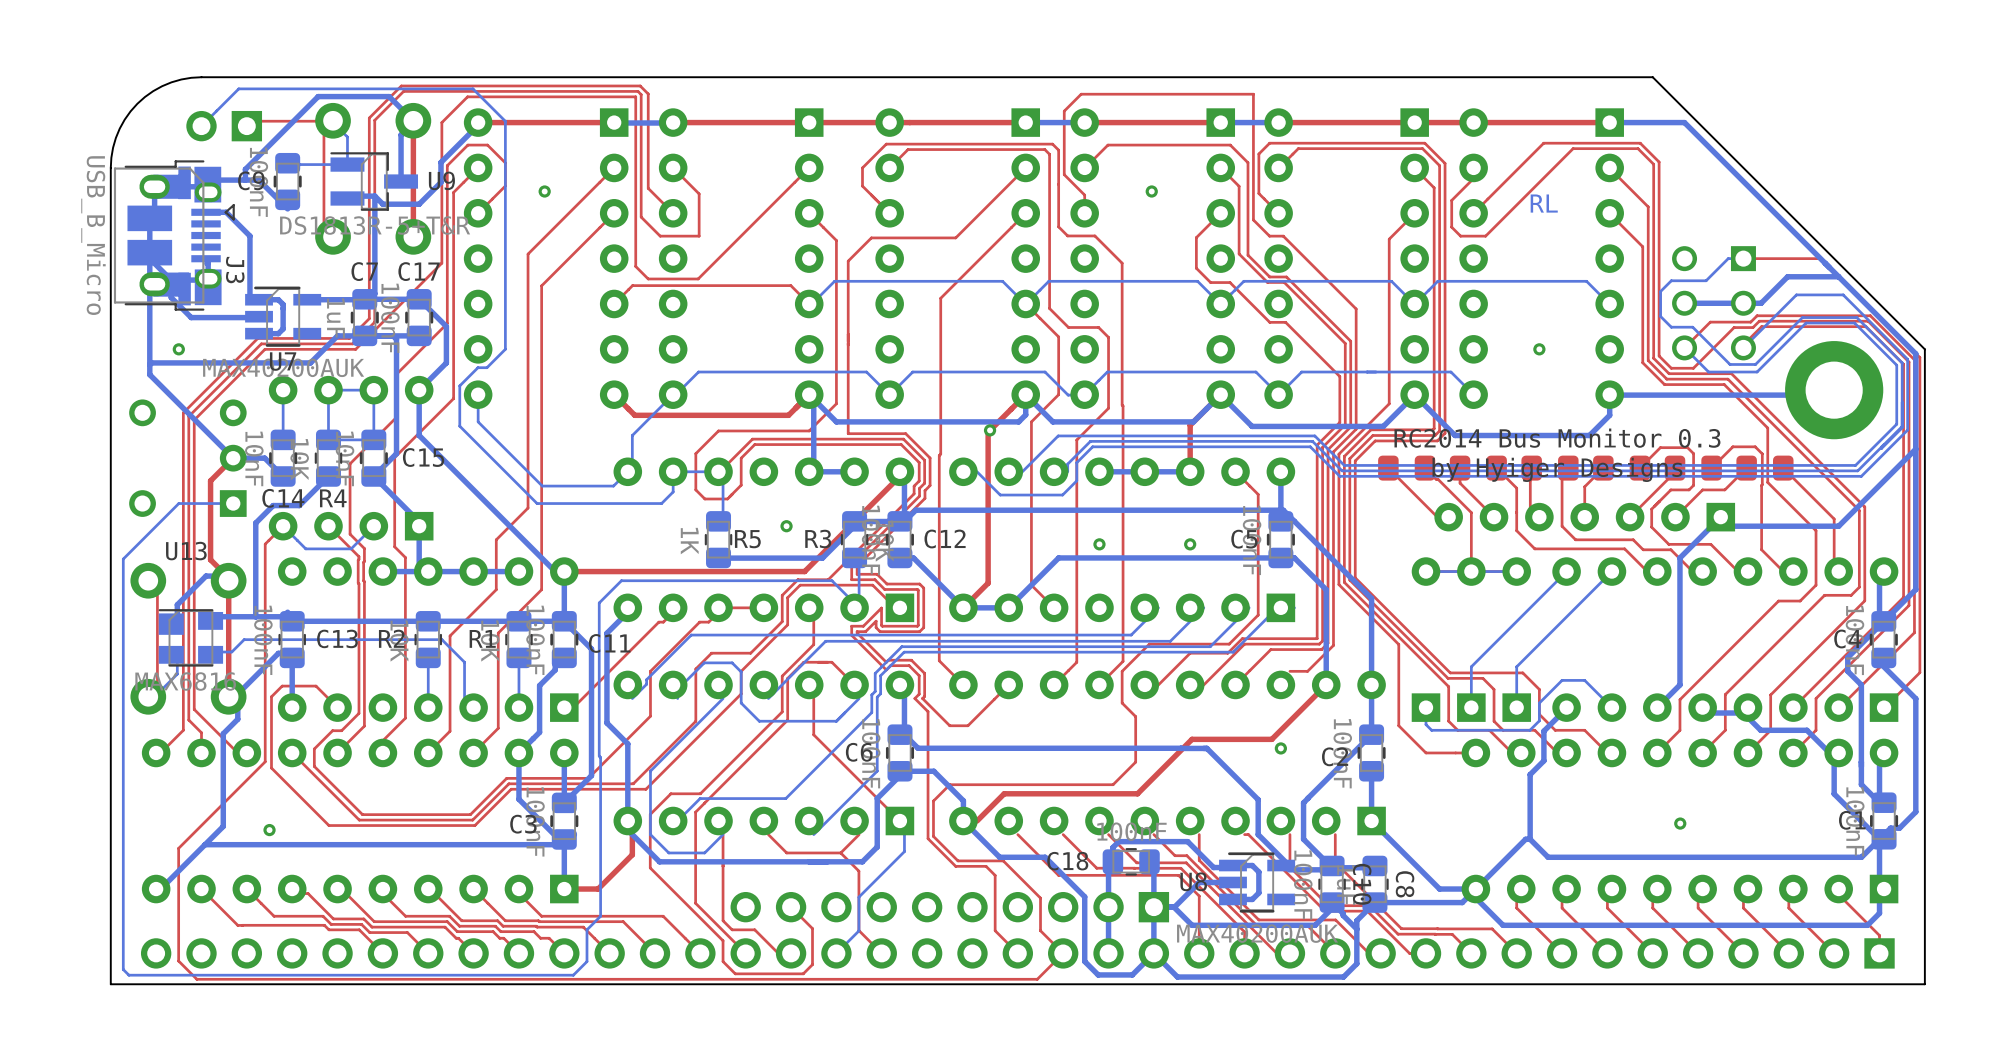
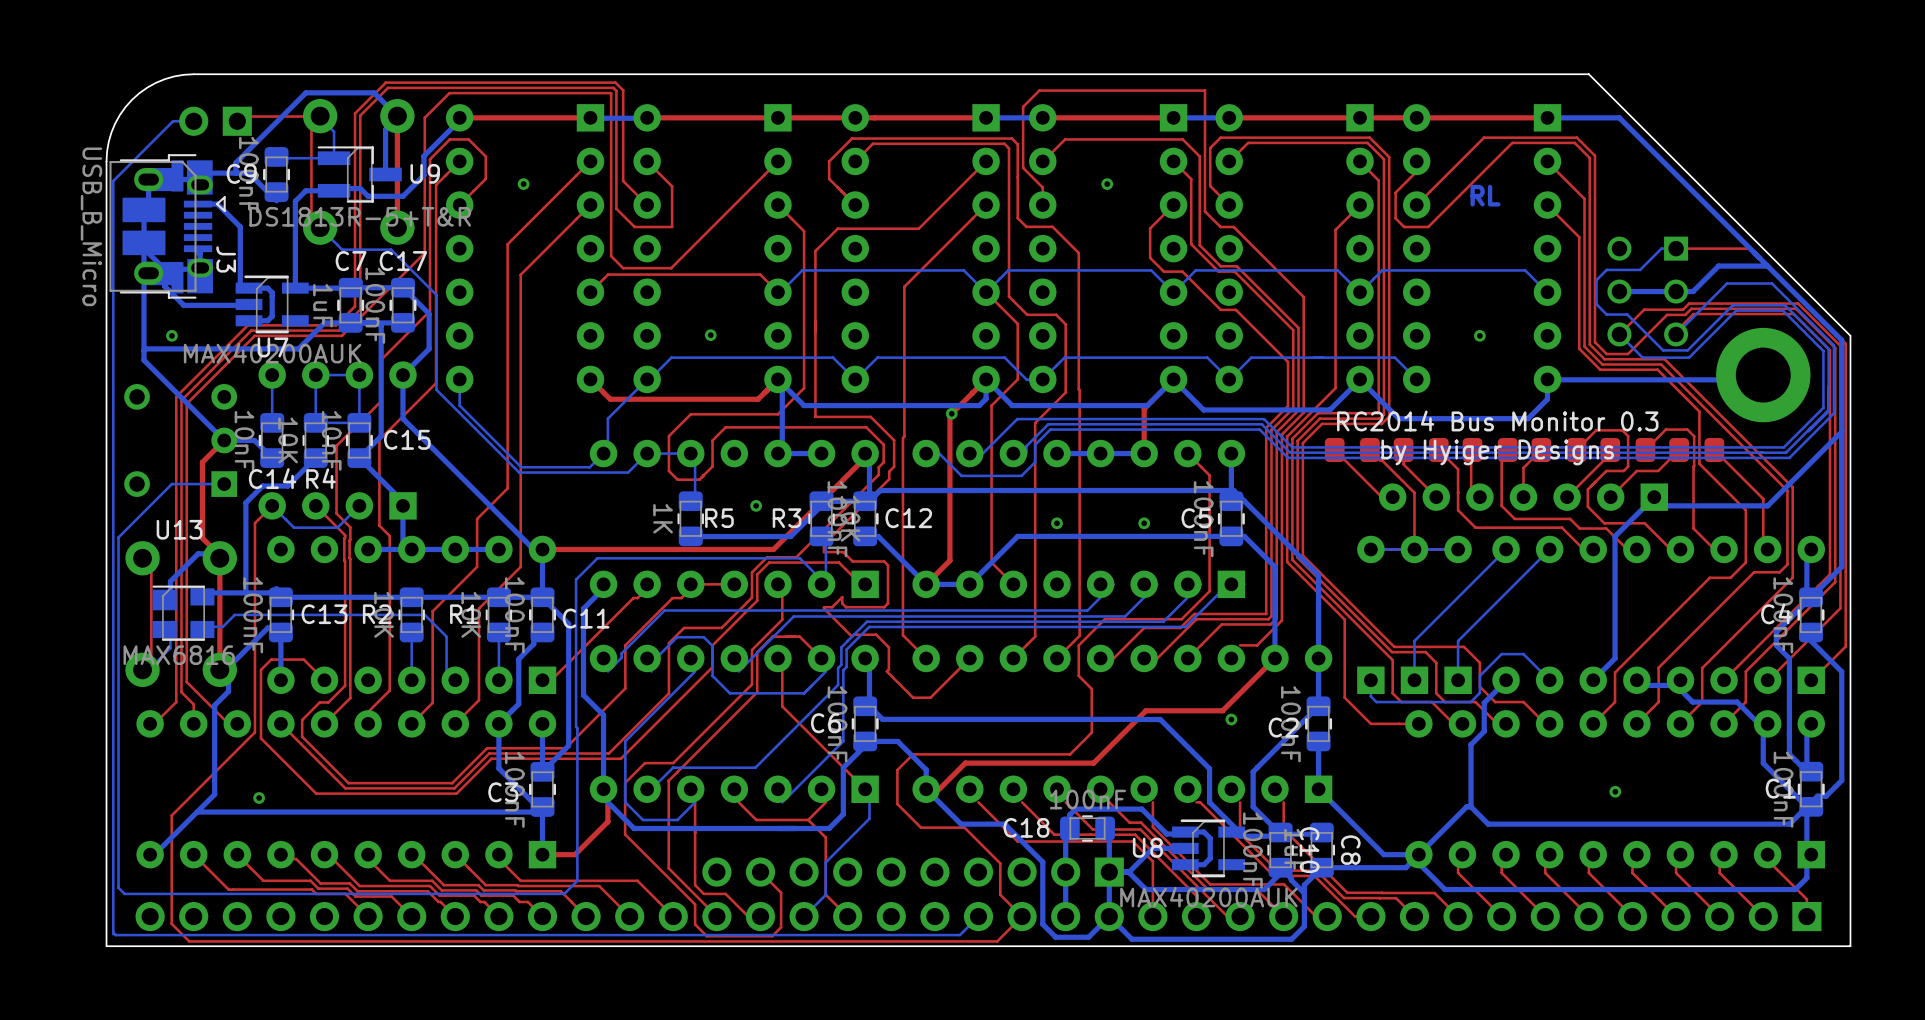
bottom track: (201, 126) (238, 88) (472, 88) (505, 121) (505, 349) (486, 367) (477, 367) (459, 385) (459, 426) (537, 503) (661, 503) (673, 491) (673, 471) -> (320, 227) (342, 249) (391, 249) (436, 295) (436, 389) (519, 472) (628, 472) (647, 453)
bottom track: none -> (193, 121) (173, 121) (113, 181) (113, 934)
bottom track: (374, 196) (374, 293) -> none
bottom track: none -> (334, 190) (305, 190) (295, 201) (295, 288)
via: none -> (710, 335)
top track: (723, 468) (752, 439) (903, 439) (924, 460) (924, 483) (919, 488) (919, 496) (851, 563) (851, 579) (874, 579) (884, 589) (917, 589) (918, 625) (882, 626) (881, 608) (863, 626) (851, 626) (851, 635) (886, 669) (890, 665) (909, 665) (919, 675) (919, 694) (914, 698) (928, 711) (928, 838) (955, 866) (986, 866) (995, 875) (995, 930) (1017, 953) -> none
bottom track: (123, 923) (123, 969) (128, 975) (573, 975) (586, 961) (586, 929) -> (118, 887) (124, 893) (564, 893)
bottom track: none -> (978, 916) (959, 935) (115, 935) (113, 932)

